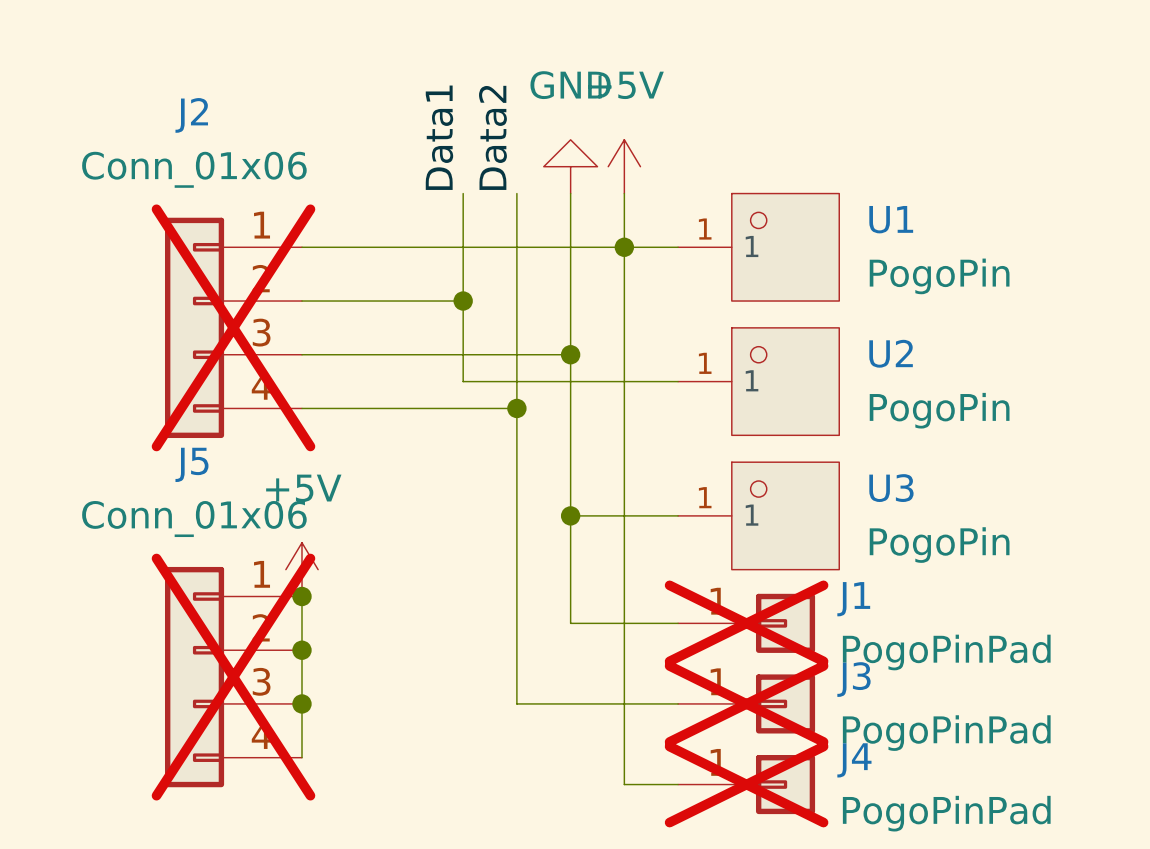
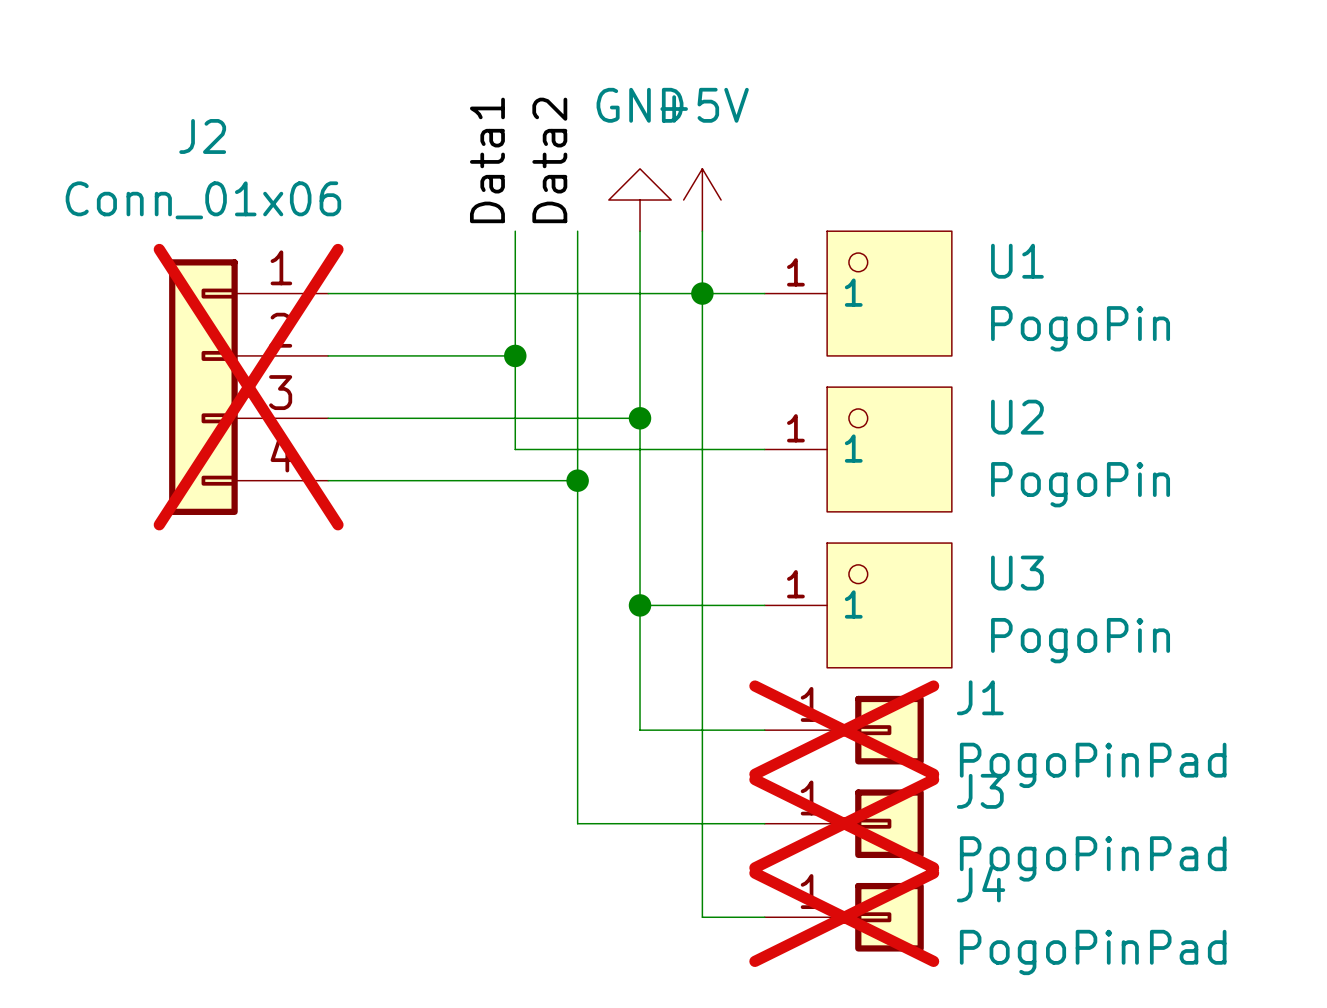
power symbol: +5V (301, 569) -> none
wire: (301, 596) (301, 757) -> none
junction: (301, 596) -> none
junction: (301, 650) -> none
J5: Conn_01x06 (233, 677) -> none
junction: (301, 703) -> none

